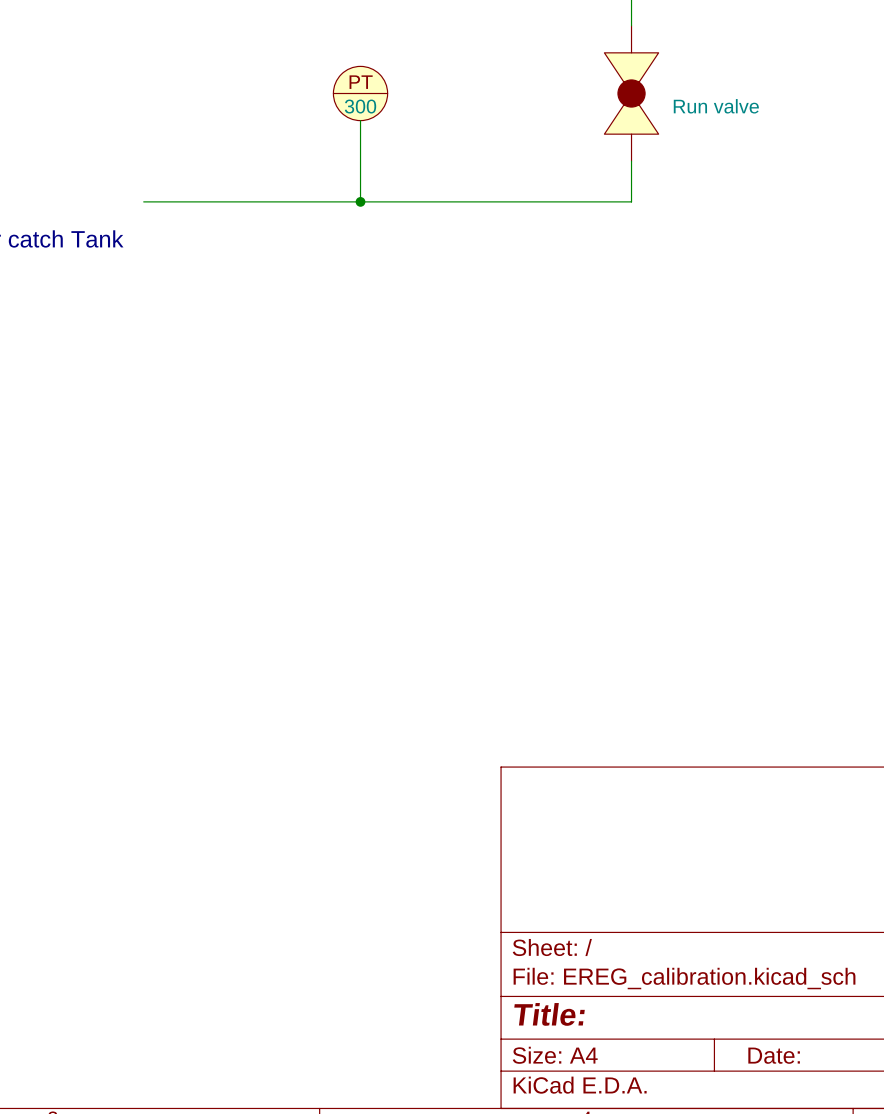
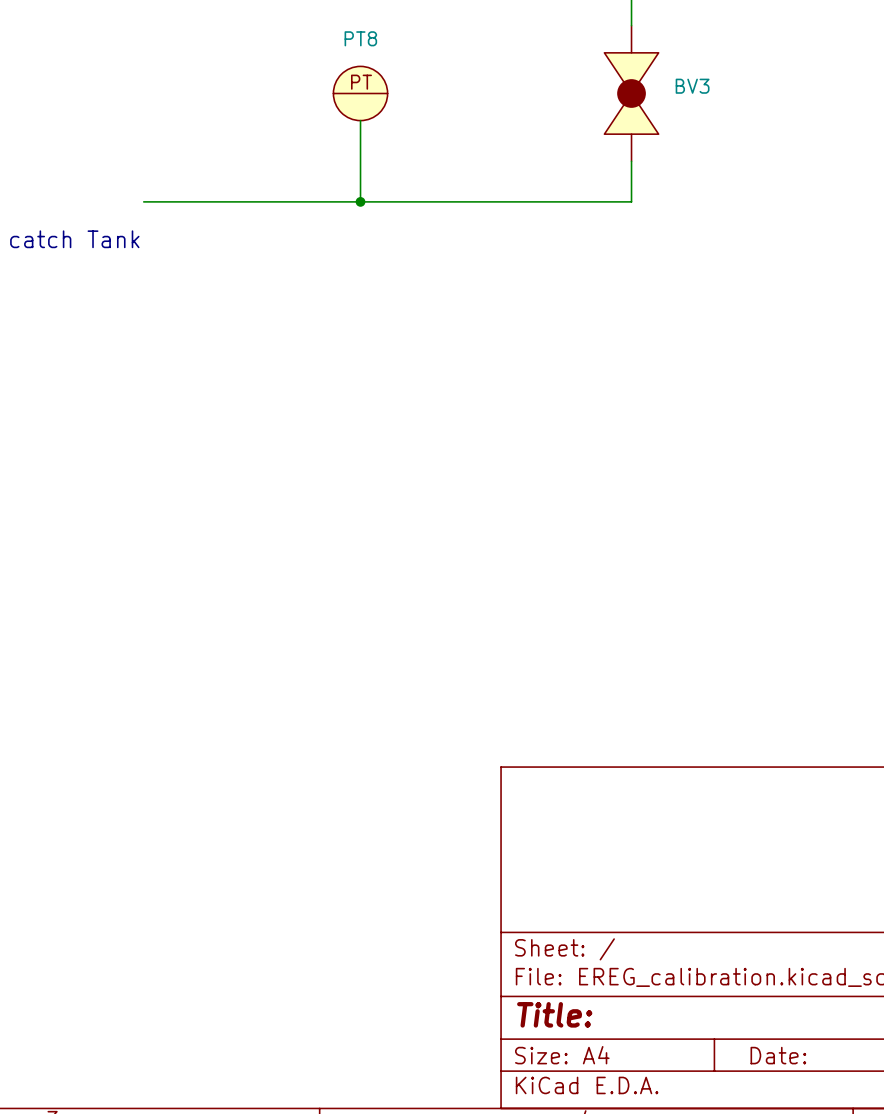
PT8 name: none -> PT8 (360, 38)
BV3 name: none -> BV3 (692, 86)
PT8 value: 300 (360, 106) -> none
BV3 value: Run valve (716, 106) -> none

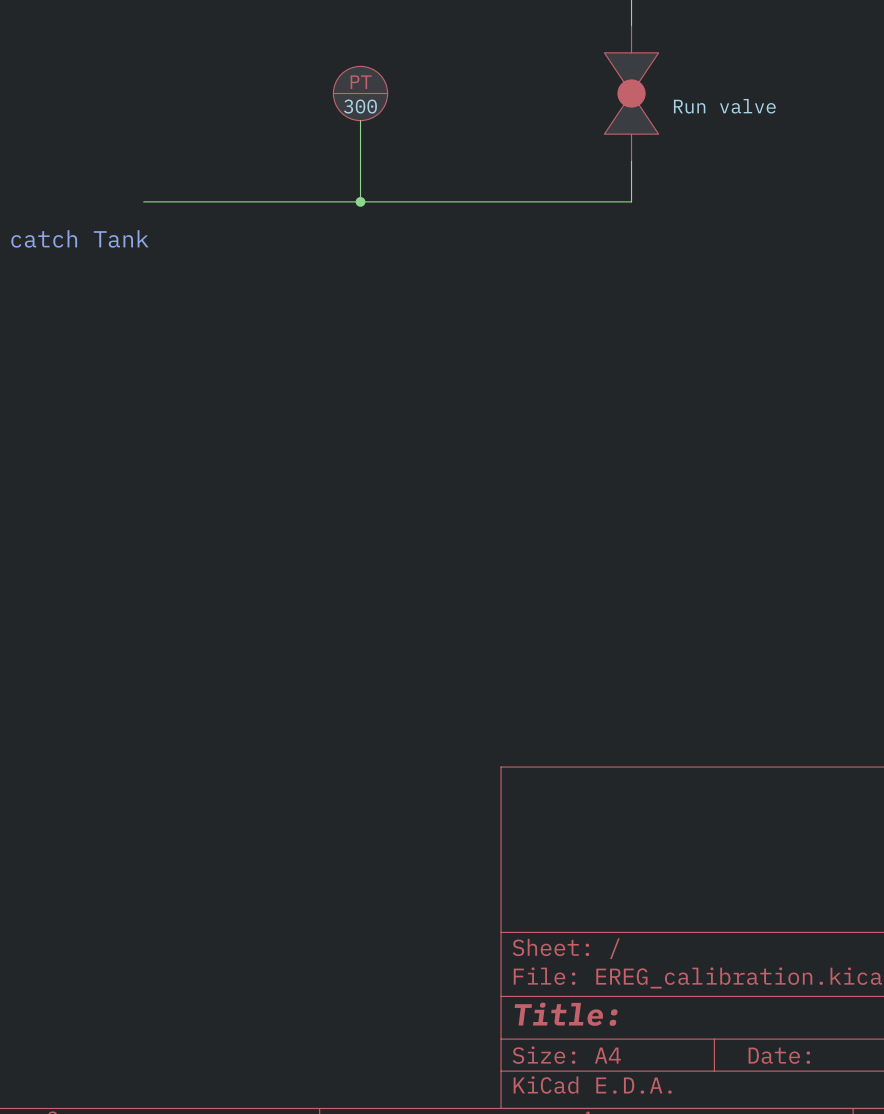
PT8 name: PT8 (360, 38) -> none
BV3 name: BV3 (692, 86) -> none
PT8 value: none -> 300 (360, 106)
BV3 value: none -> Run valve (724, 106)

